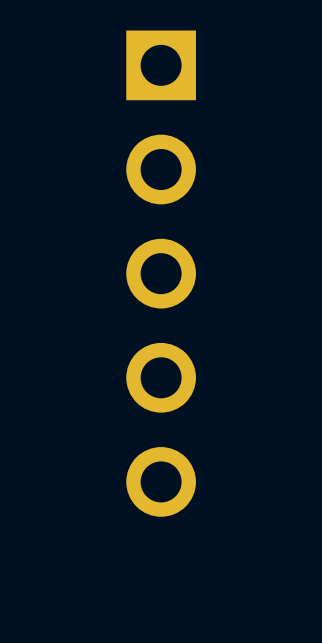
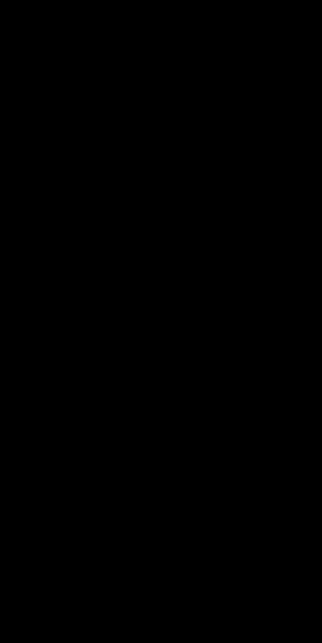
part: (161, 273) -> none

